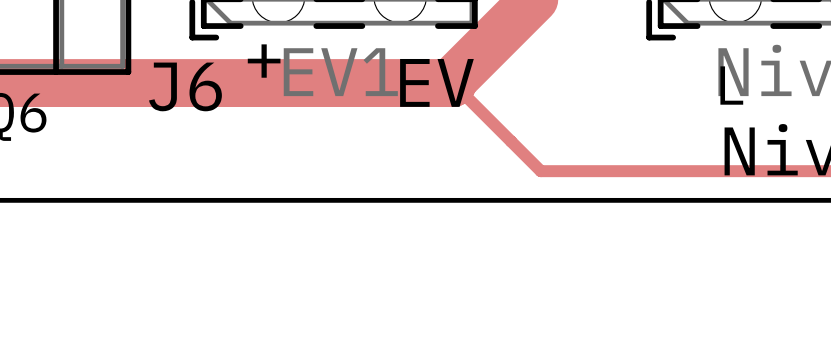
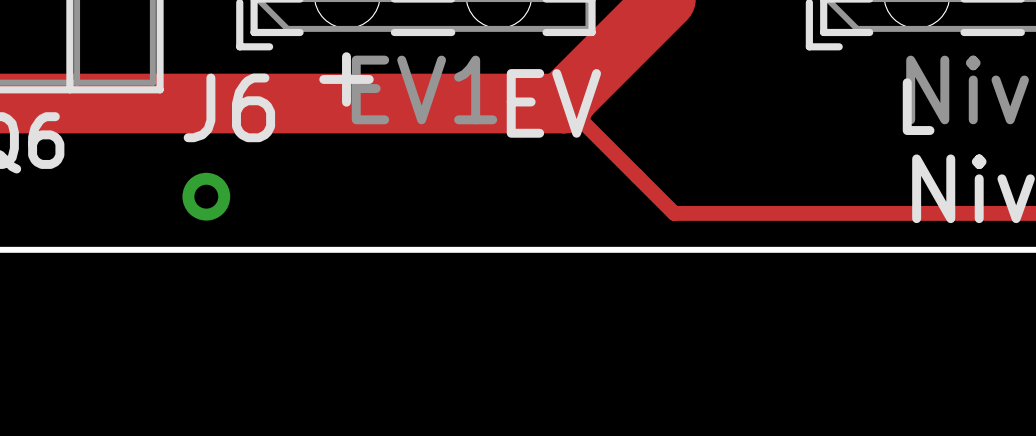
via: none -> (206, 196)

